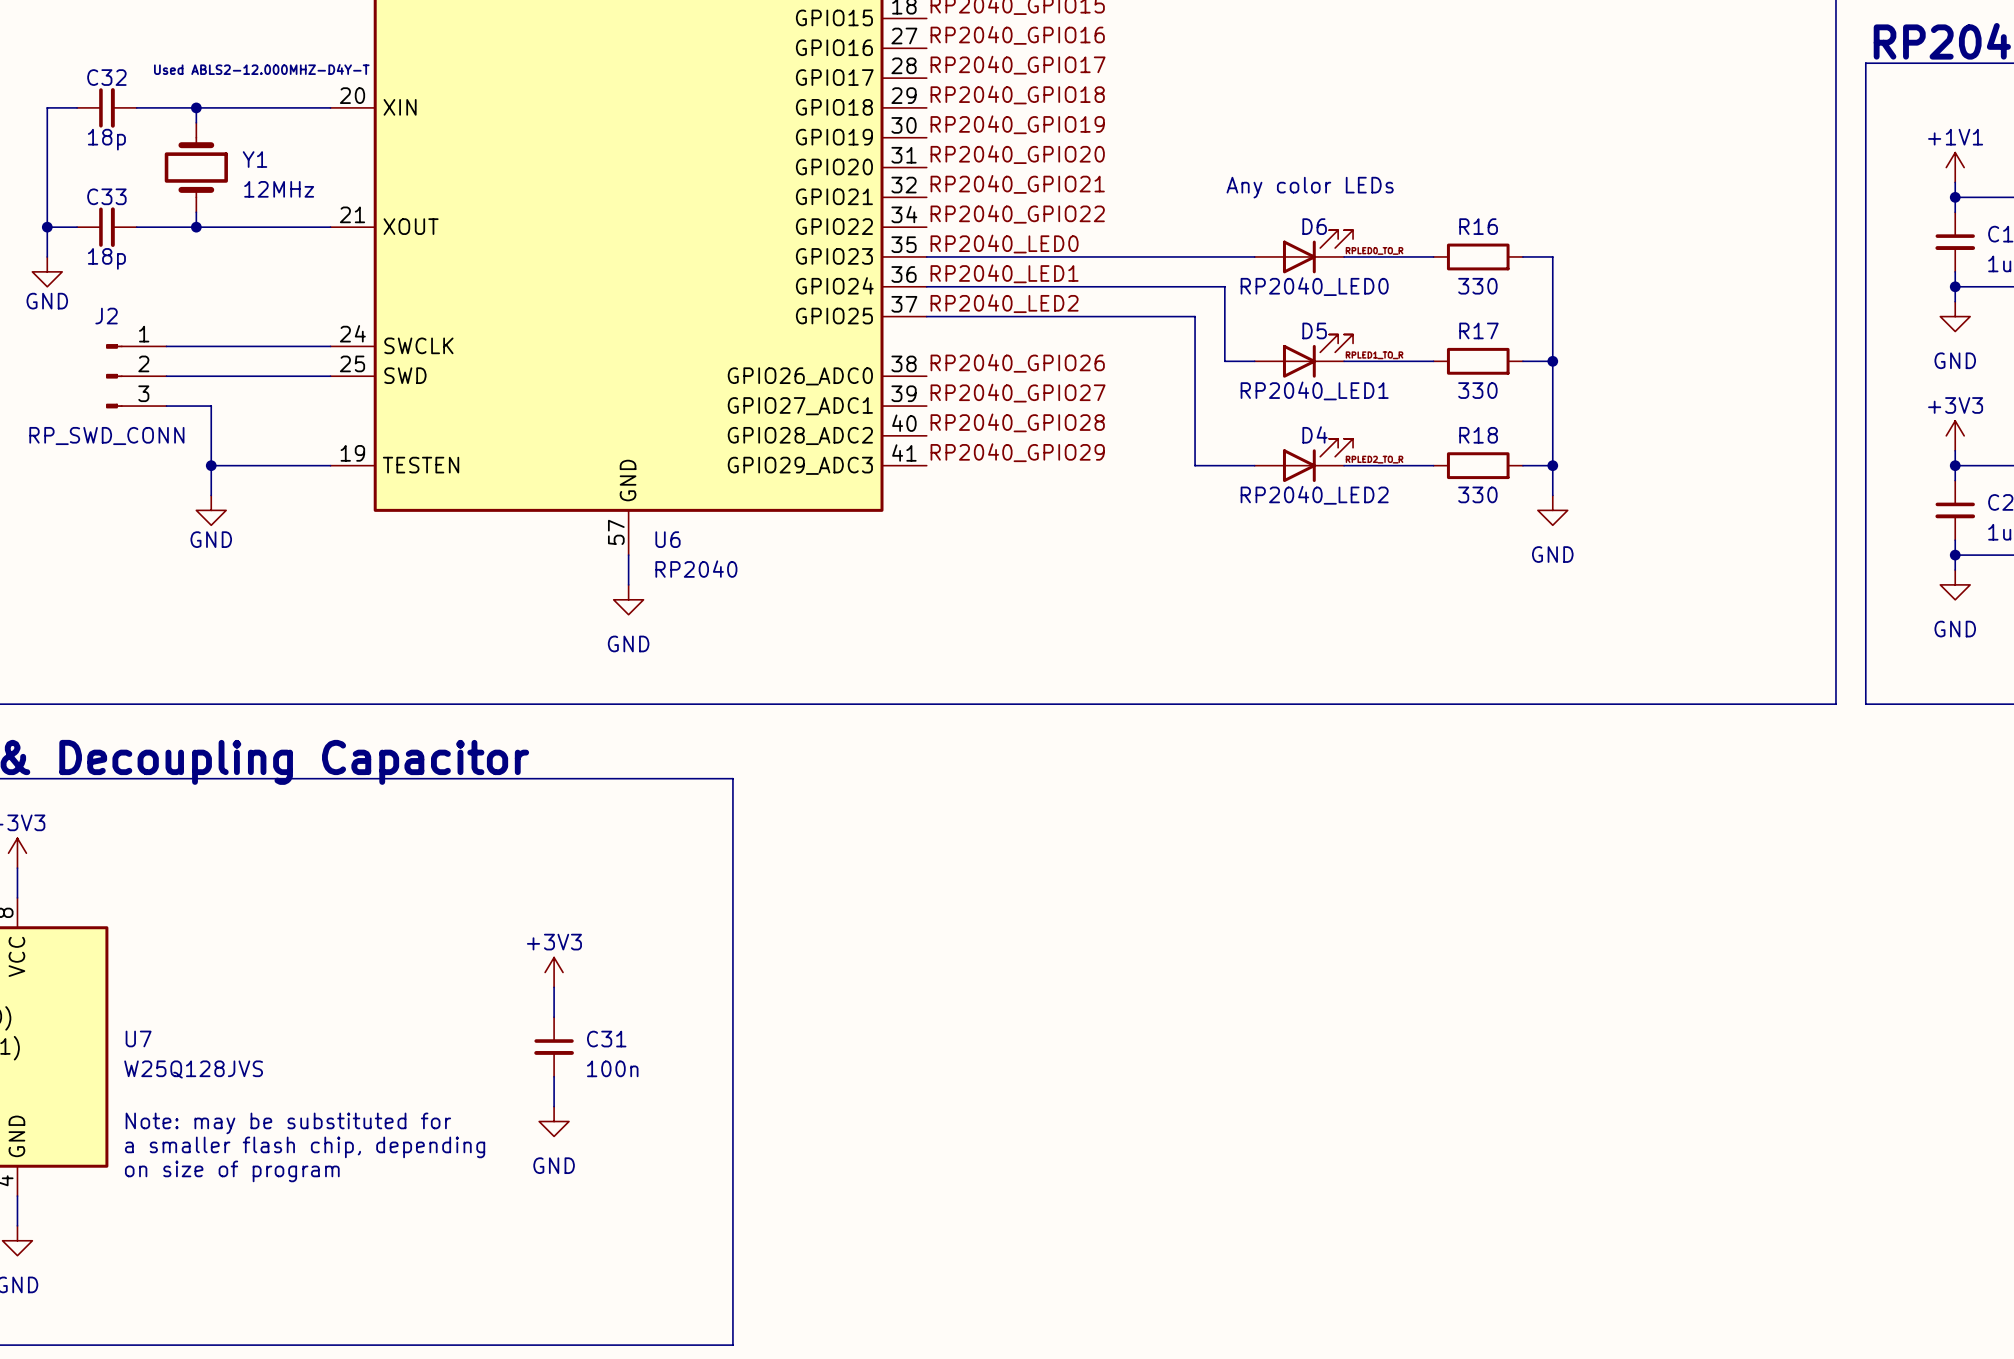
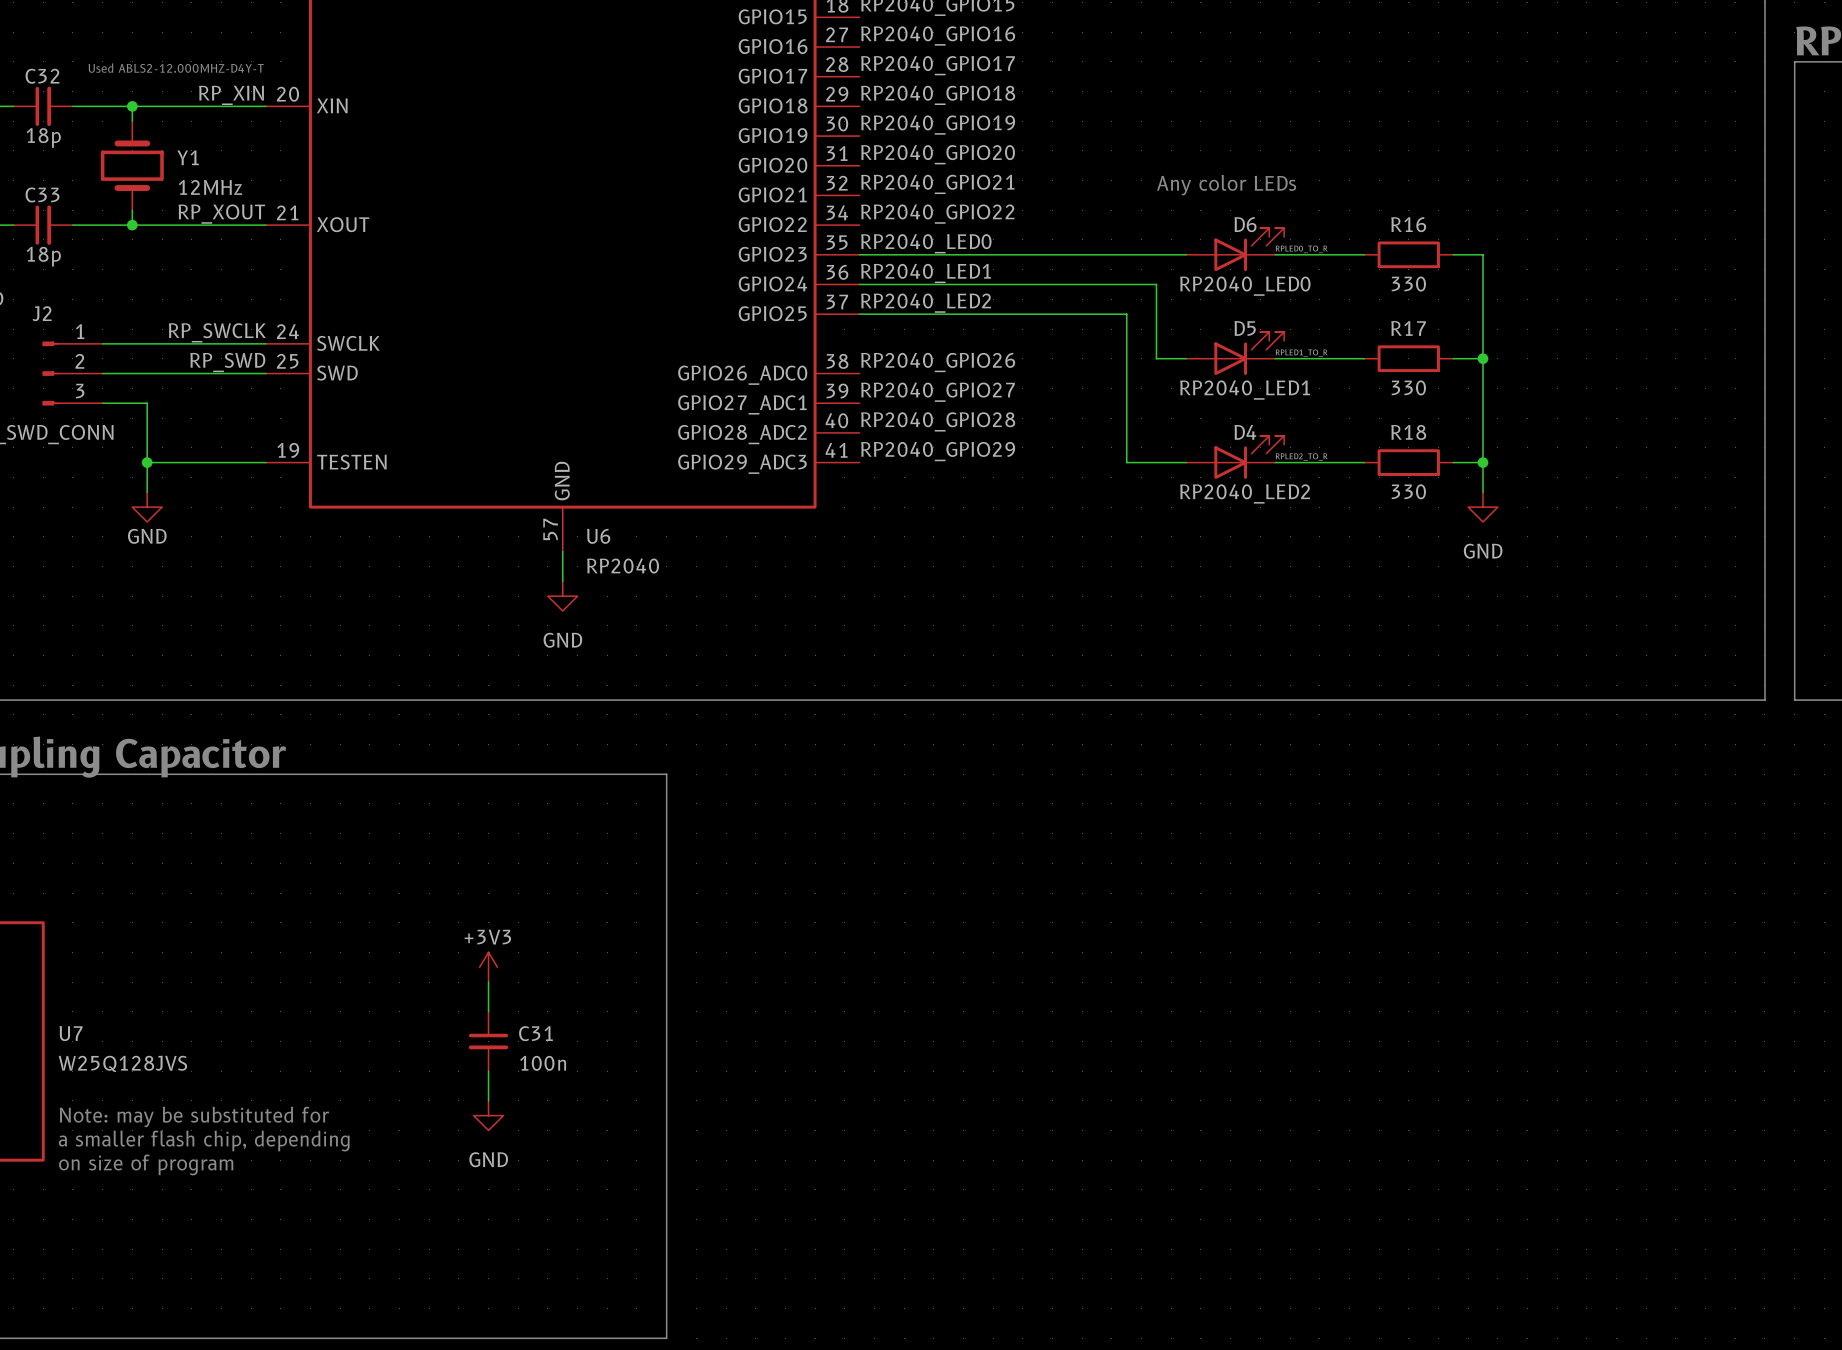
label: none -> RP_XIN (231, 95)
label: none -> RP_XOUT (221, 214)
label: none -> RP_SWCLK (217, 332)
label: none -> RP_SWD (227, 362)

